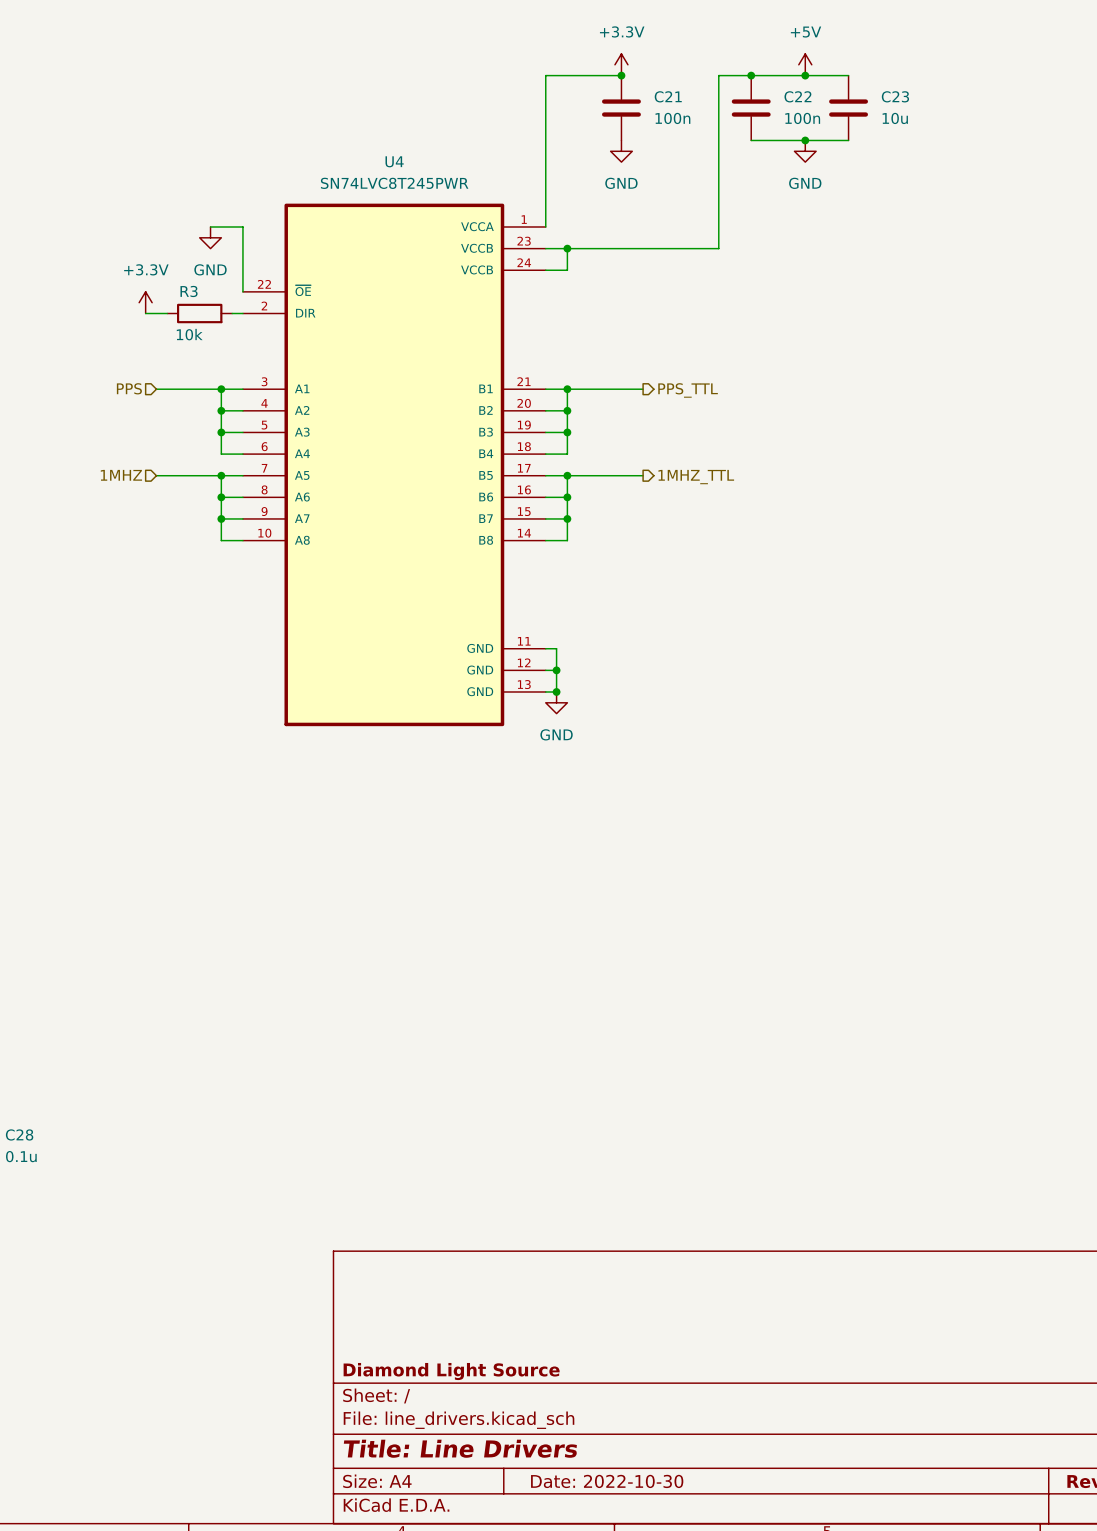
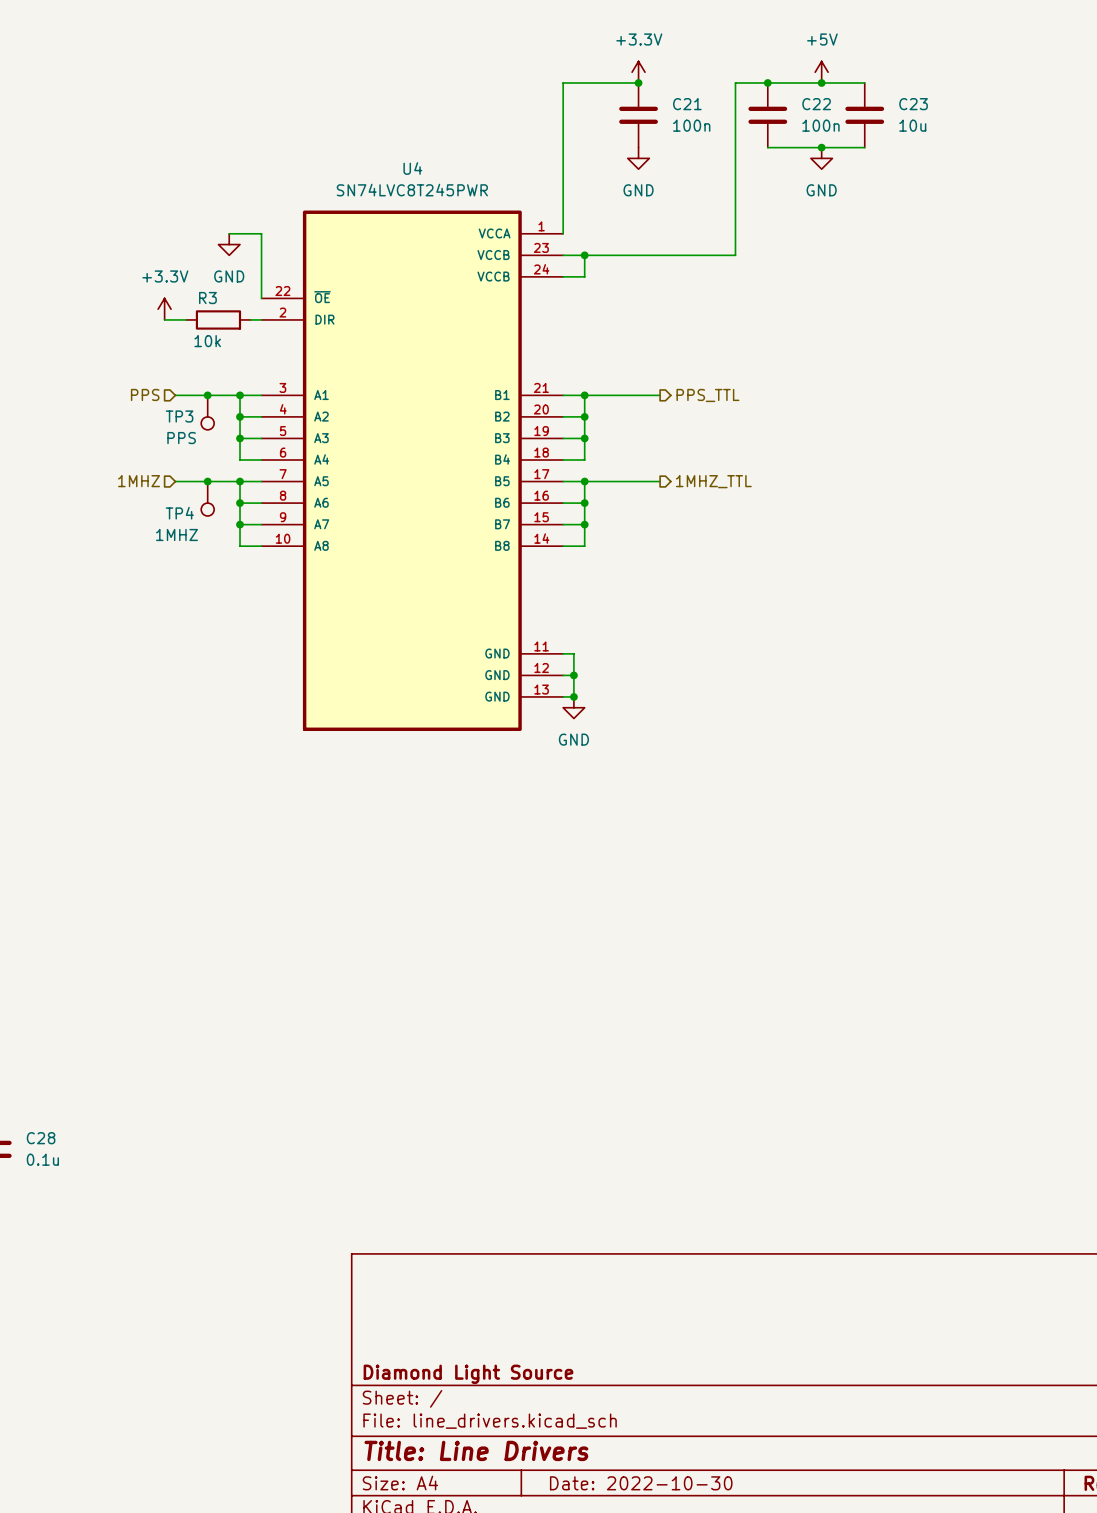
junction: none -> (207, 395)
TP3: none -> PPS (207, 412)
junction: none -> (207, 481)
TP4: none -> 1MHZ (207, 498)

